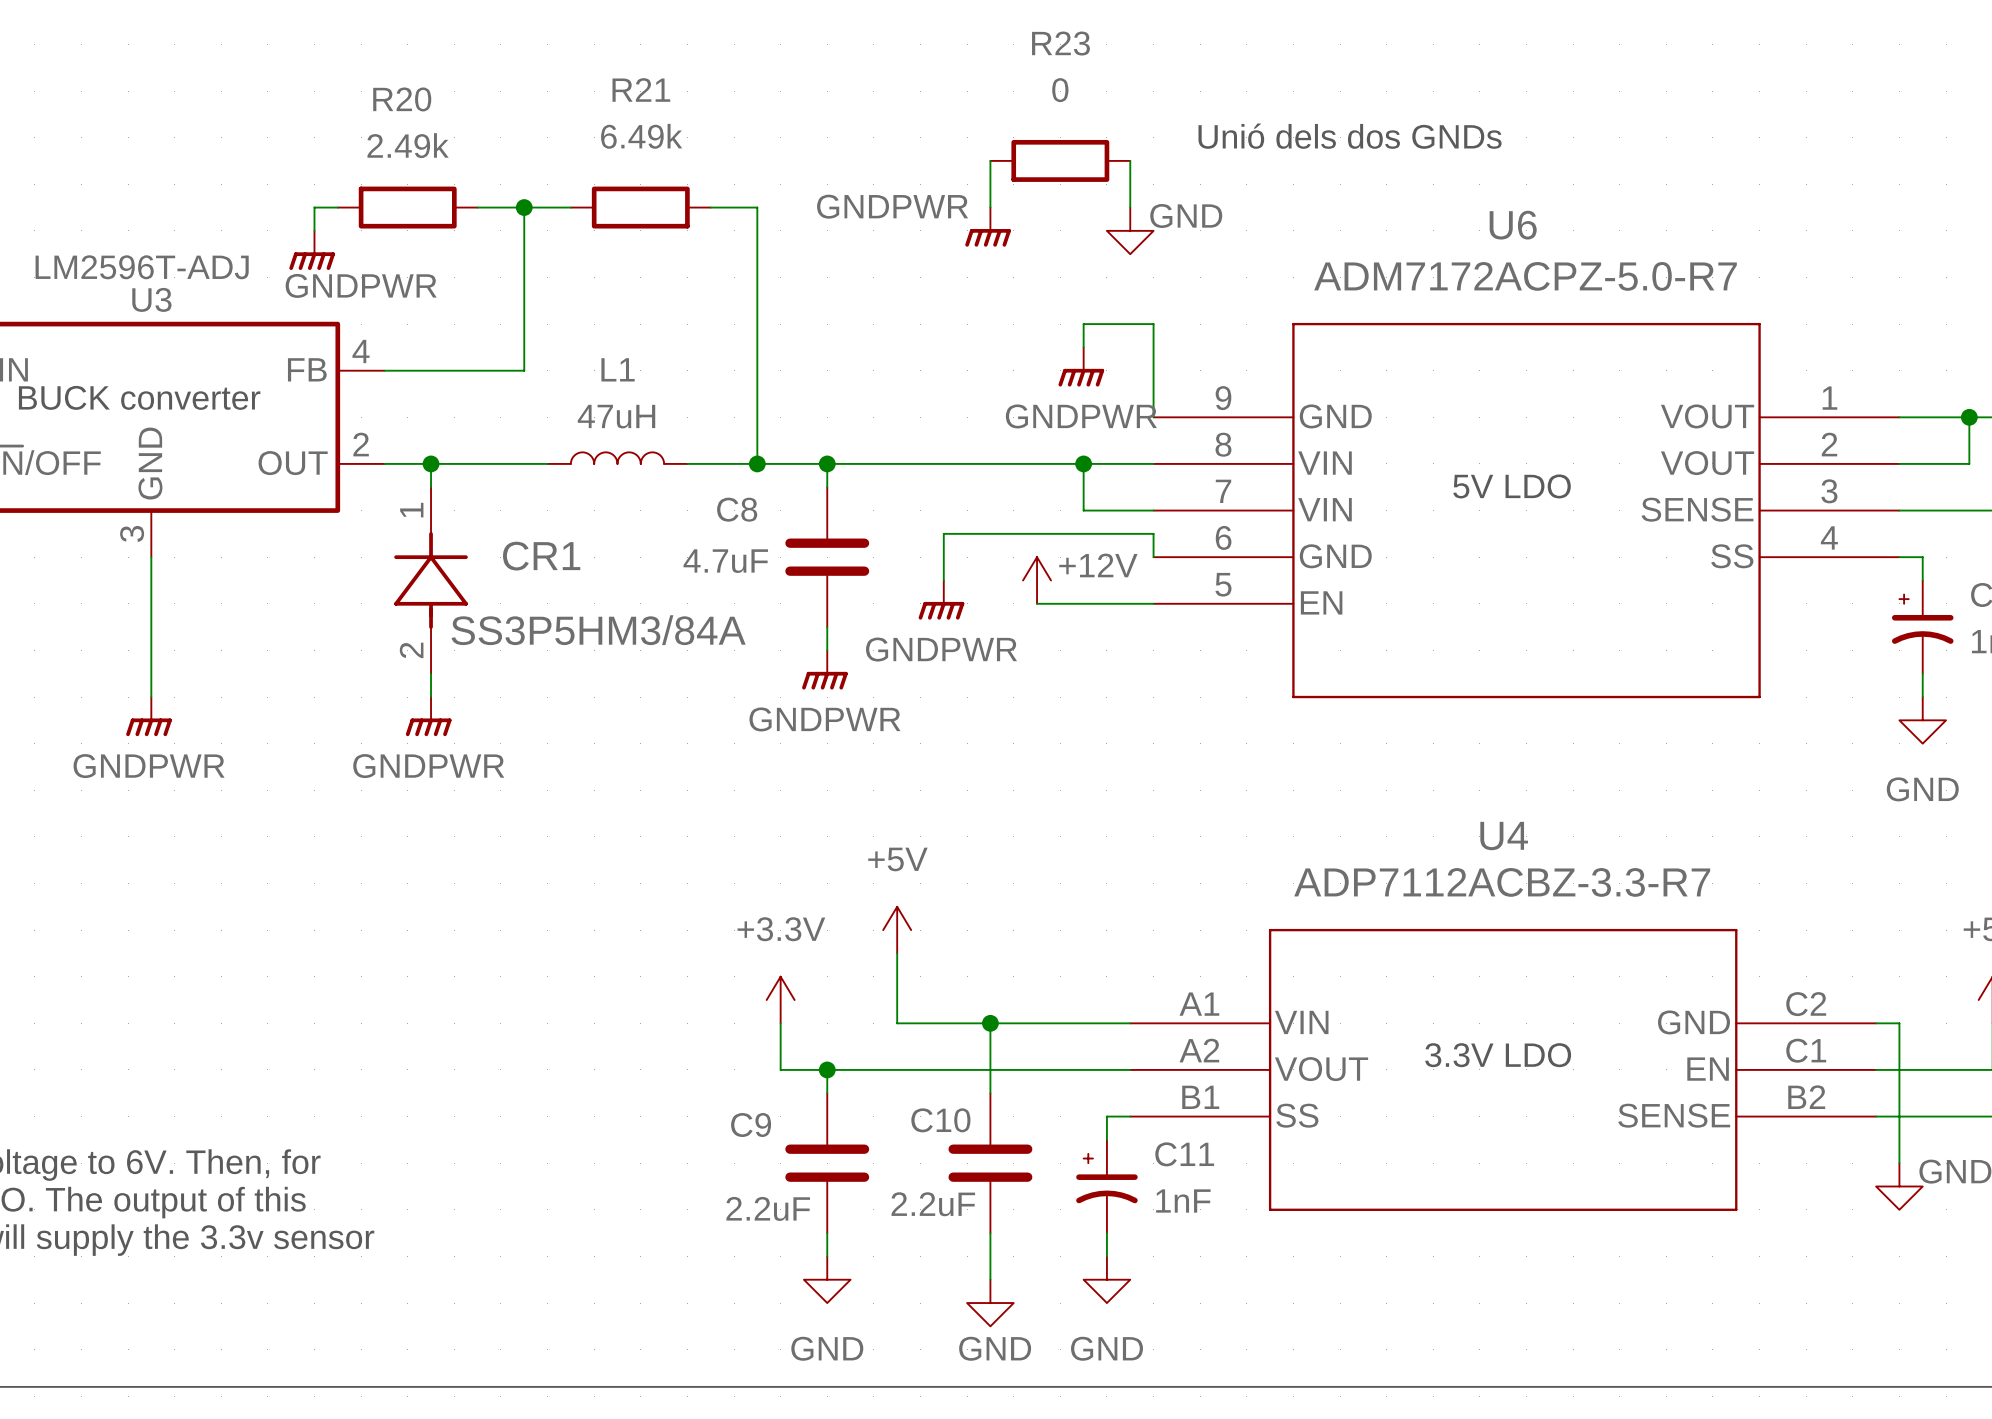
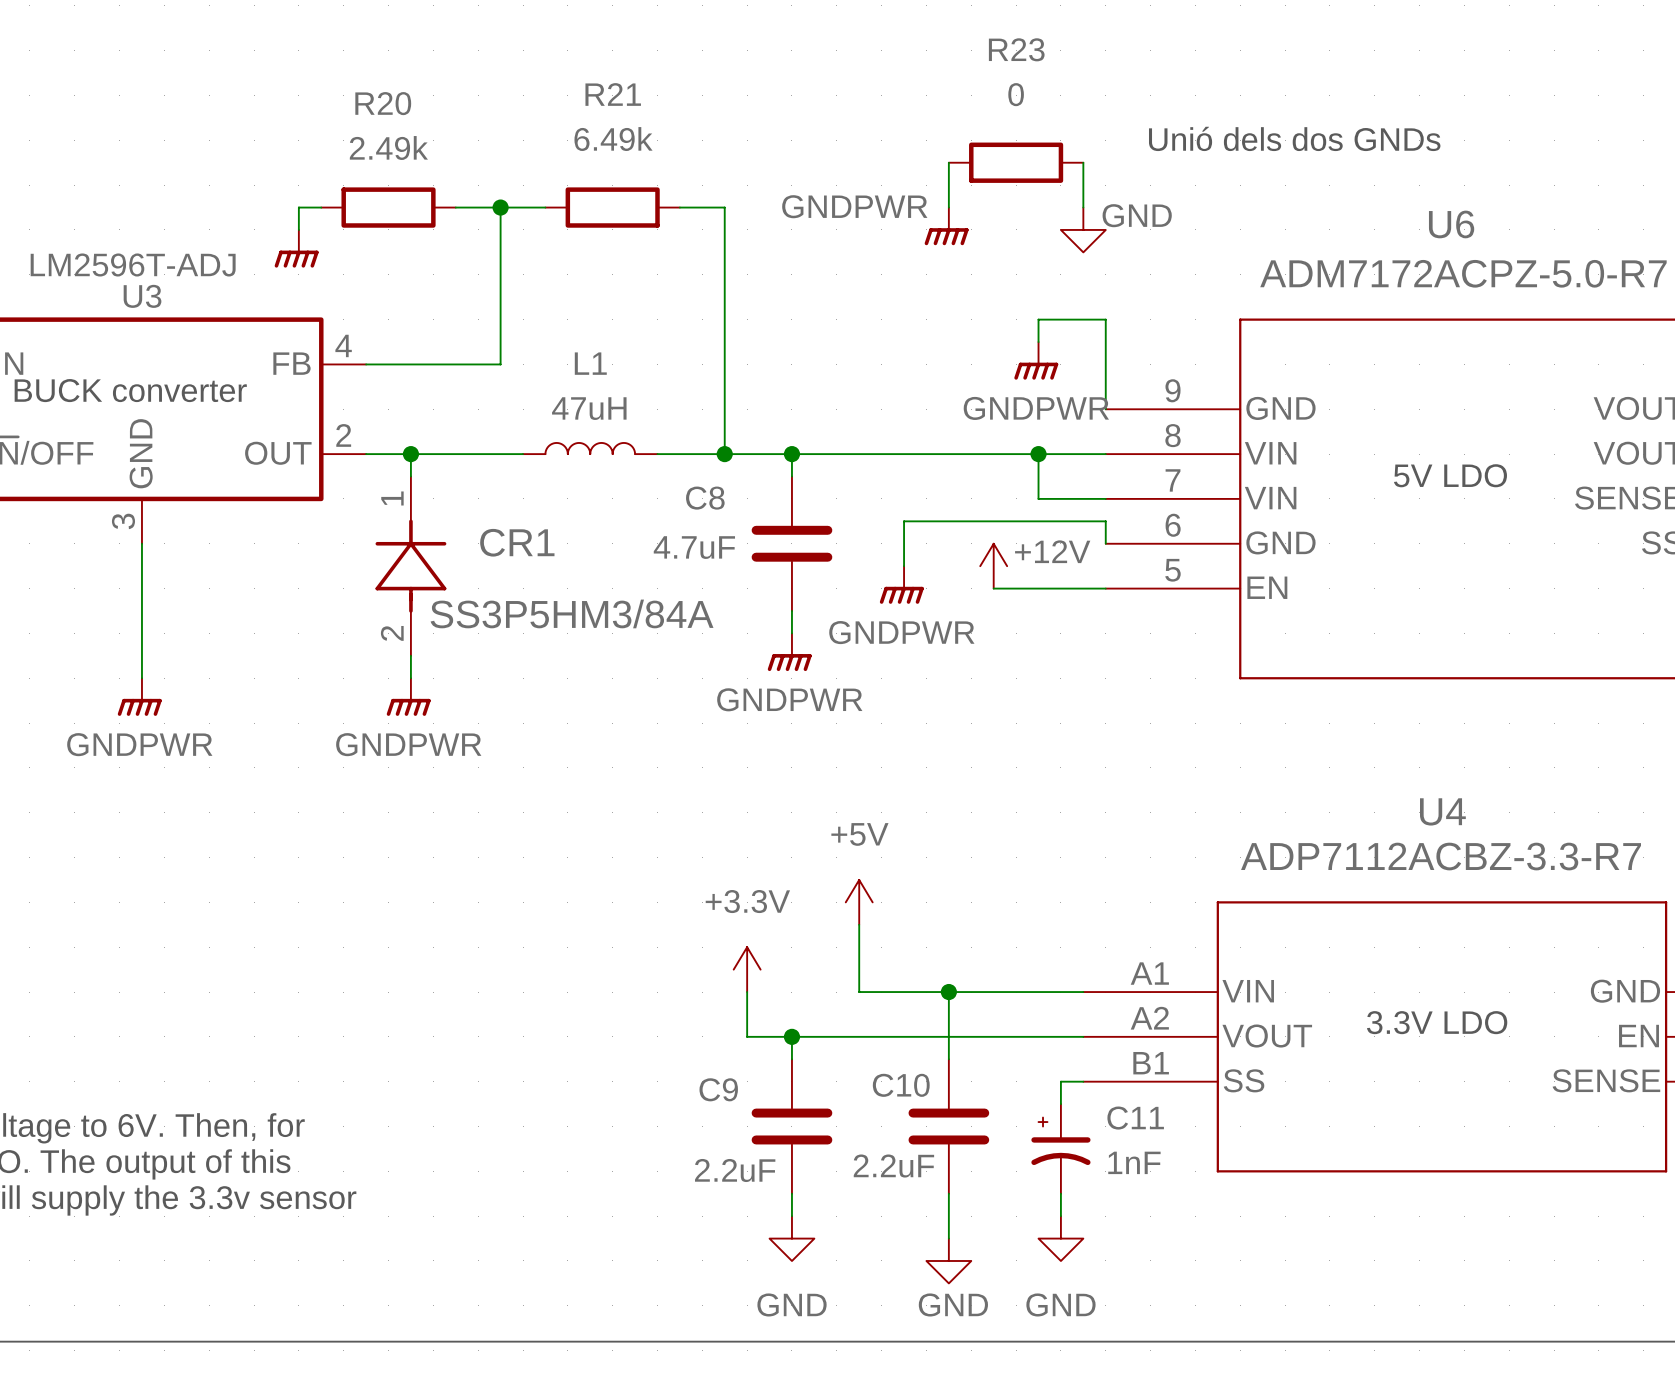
power symbol text: GNDPWR (361, 285) -> none

